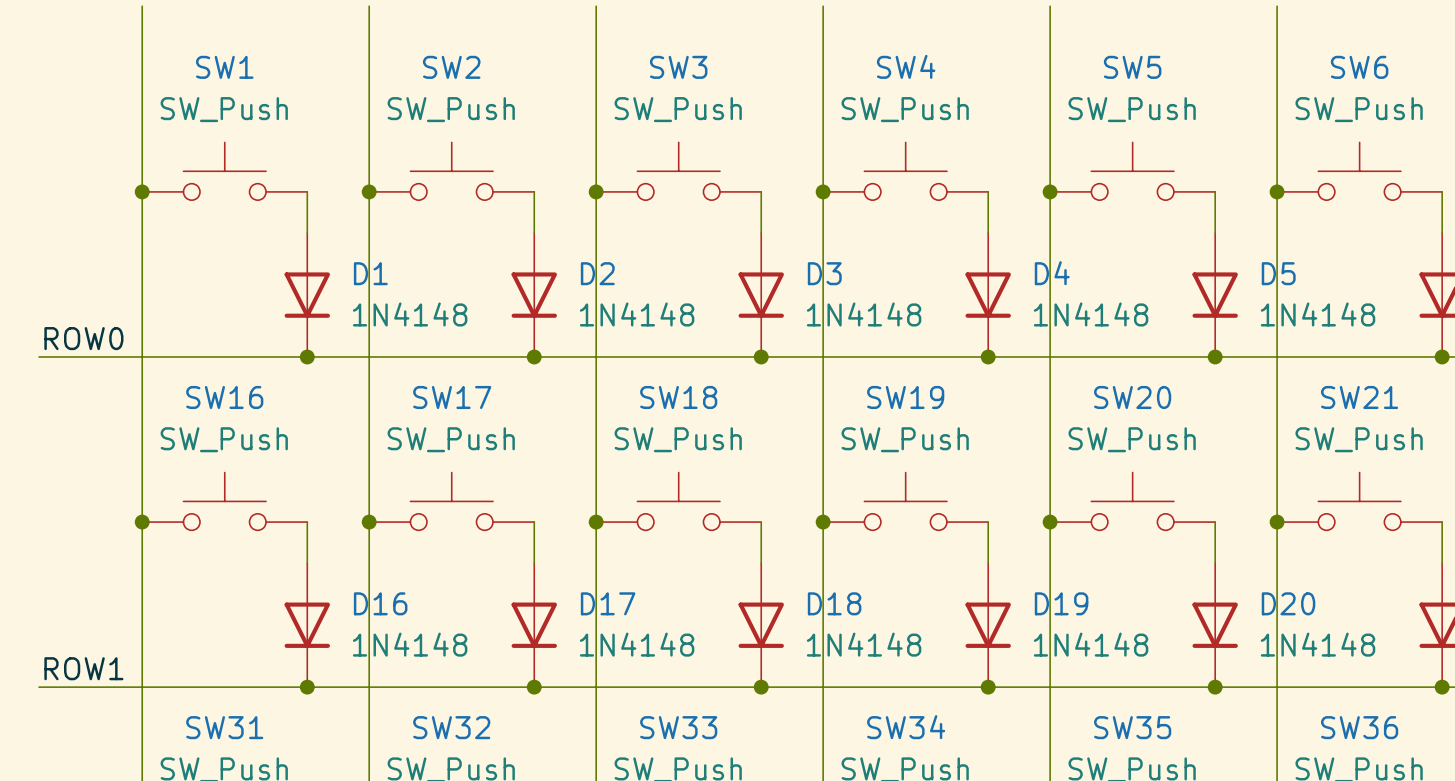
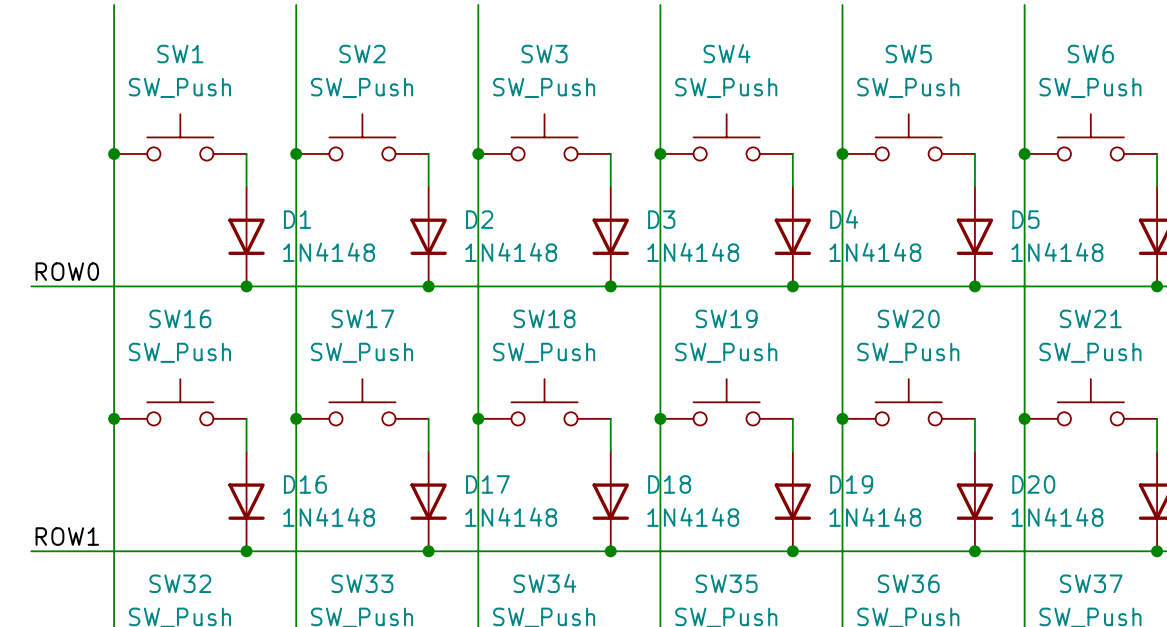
SW31 name: SW31 (224, 727) -> SW32 (180, 583)
SW32 name: SW32 (451, 727) -> SW33 (362, 583)
SW33 name: SW33 (678, 727) -> SW34 (544, 583)
SW34 name: SW34 (906, 727) -> SW35 (726, 583)
SW35 name: SW35 (1132, 727) -> SW36 (908, 583)
SW36 name: SW36 (1359, 727) -> SW37 (1091, 583)

